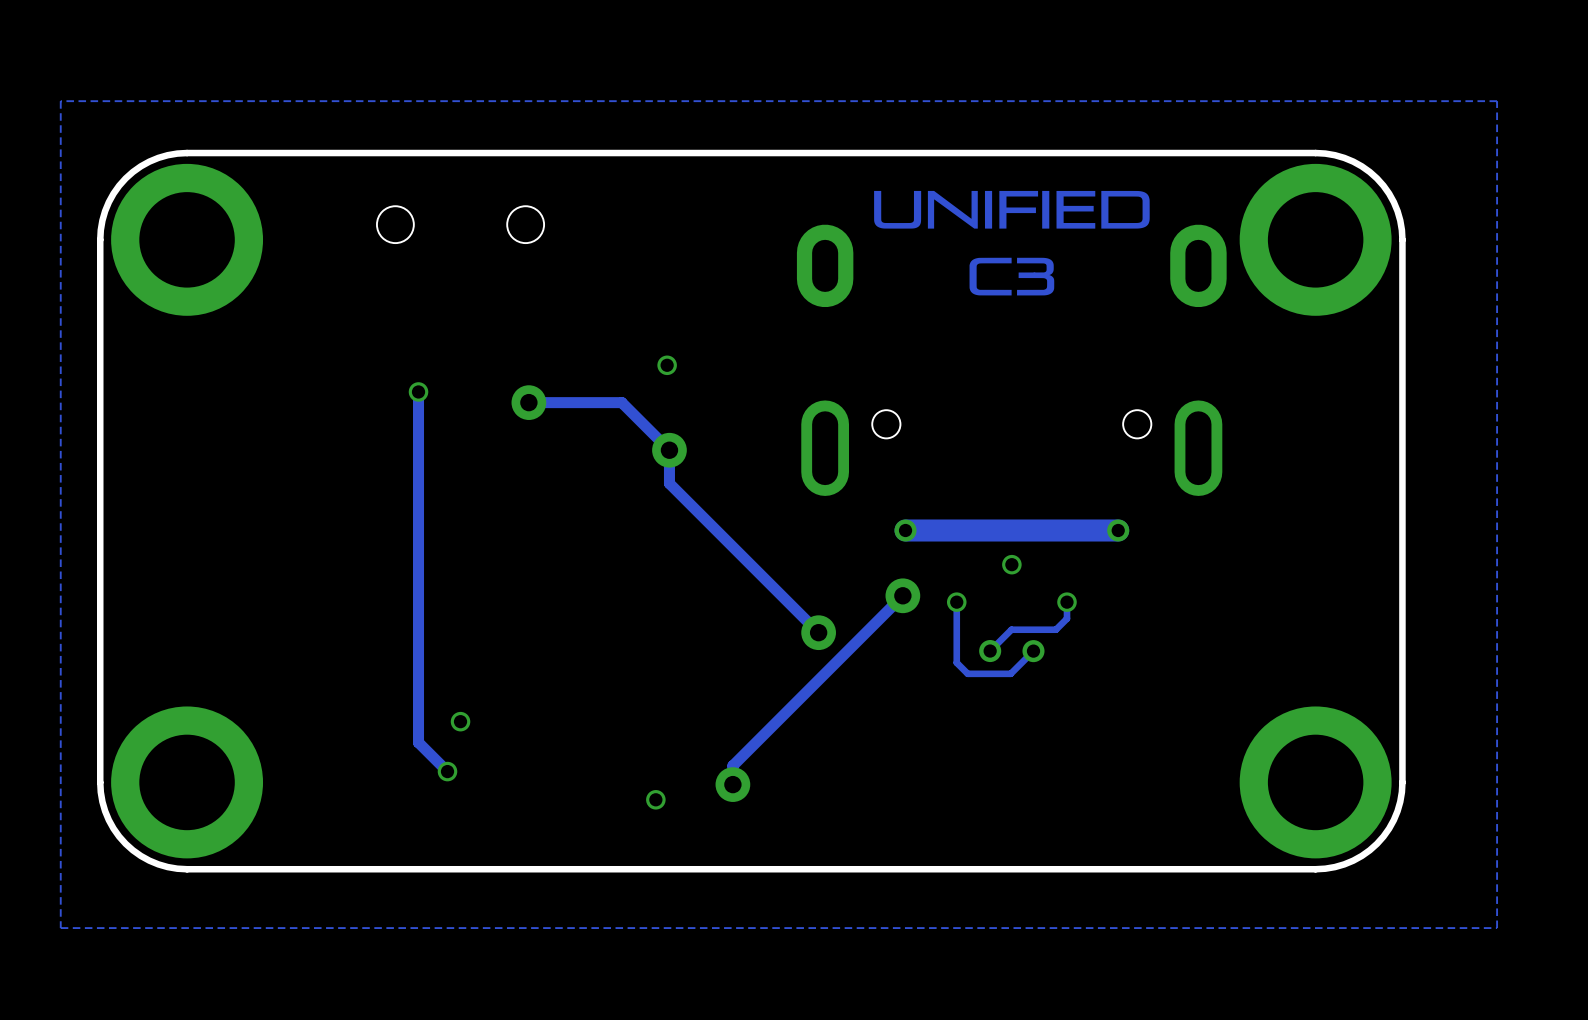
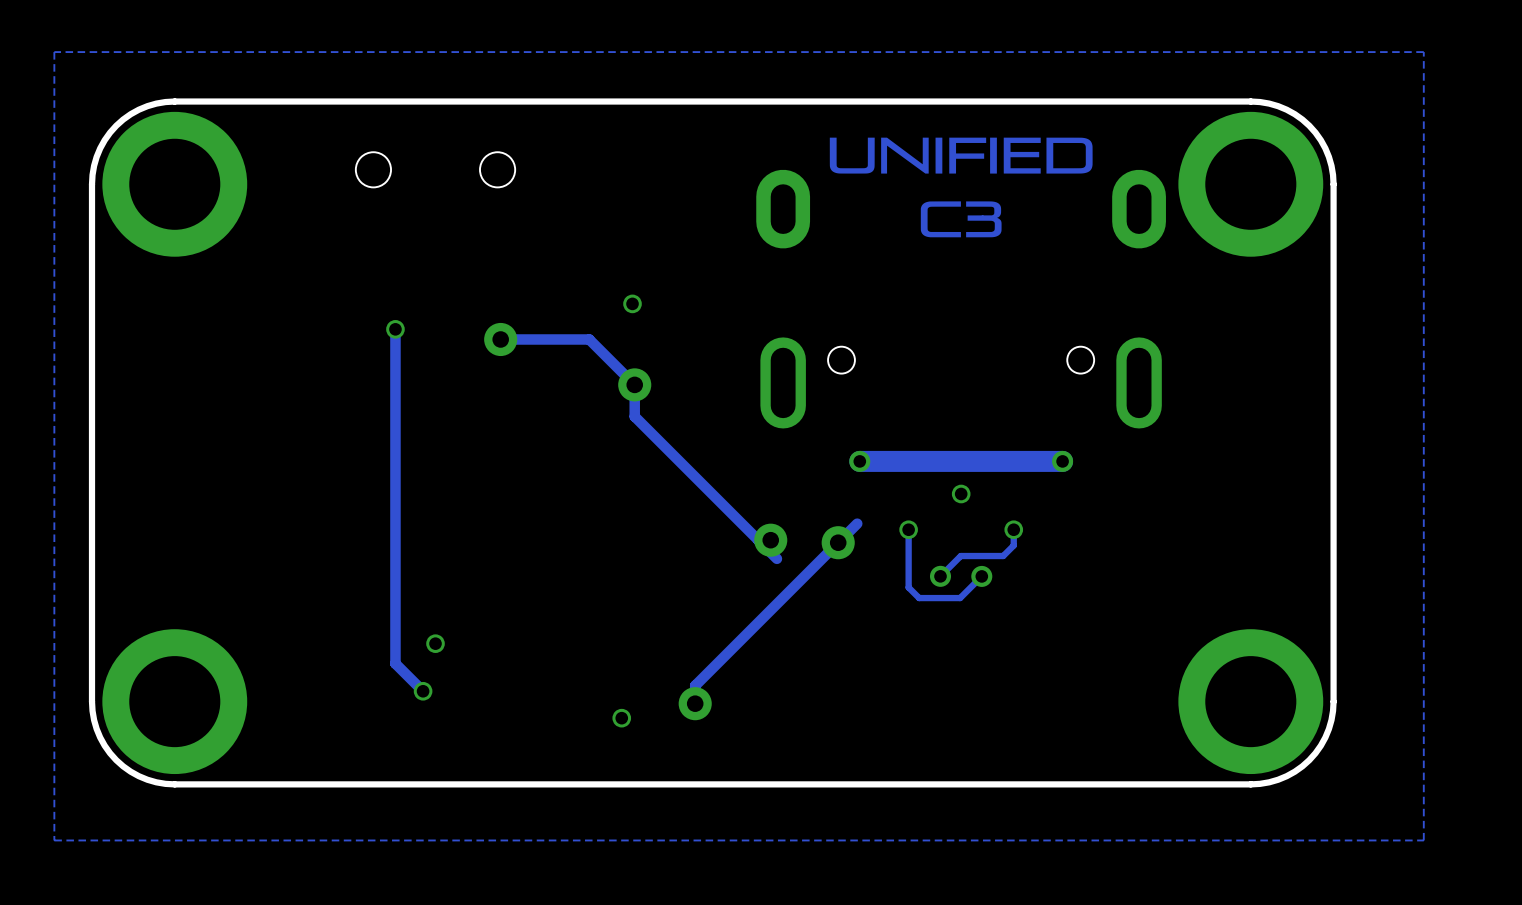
via position: (902, 595) -> (838, 542)
via position: (818, 632) -> (770, 540)

